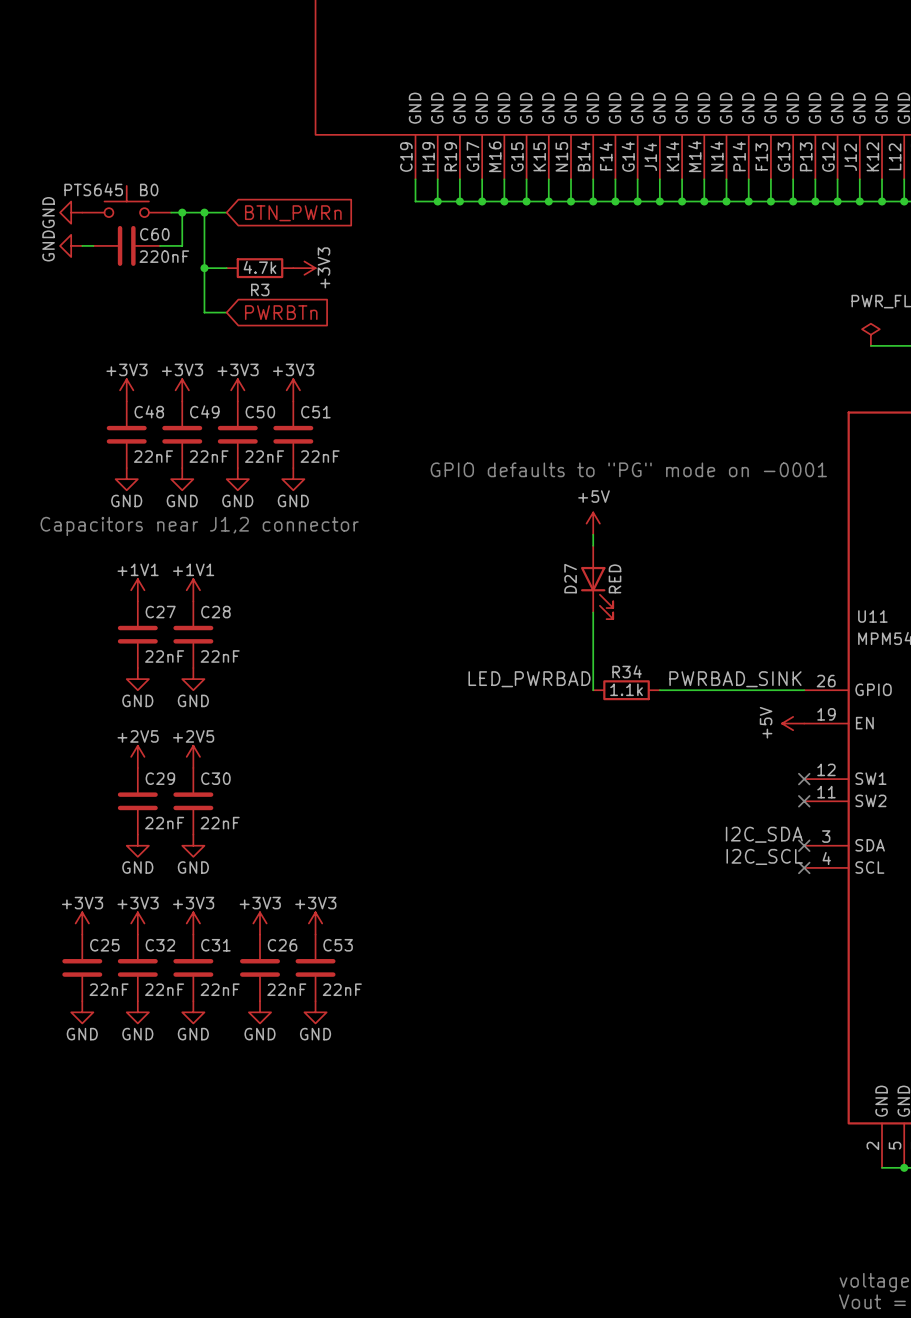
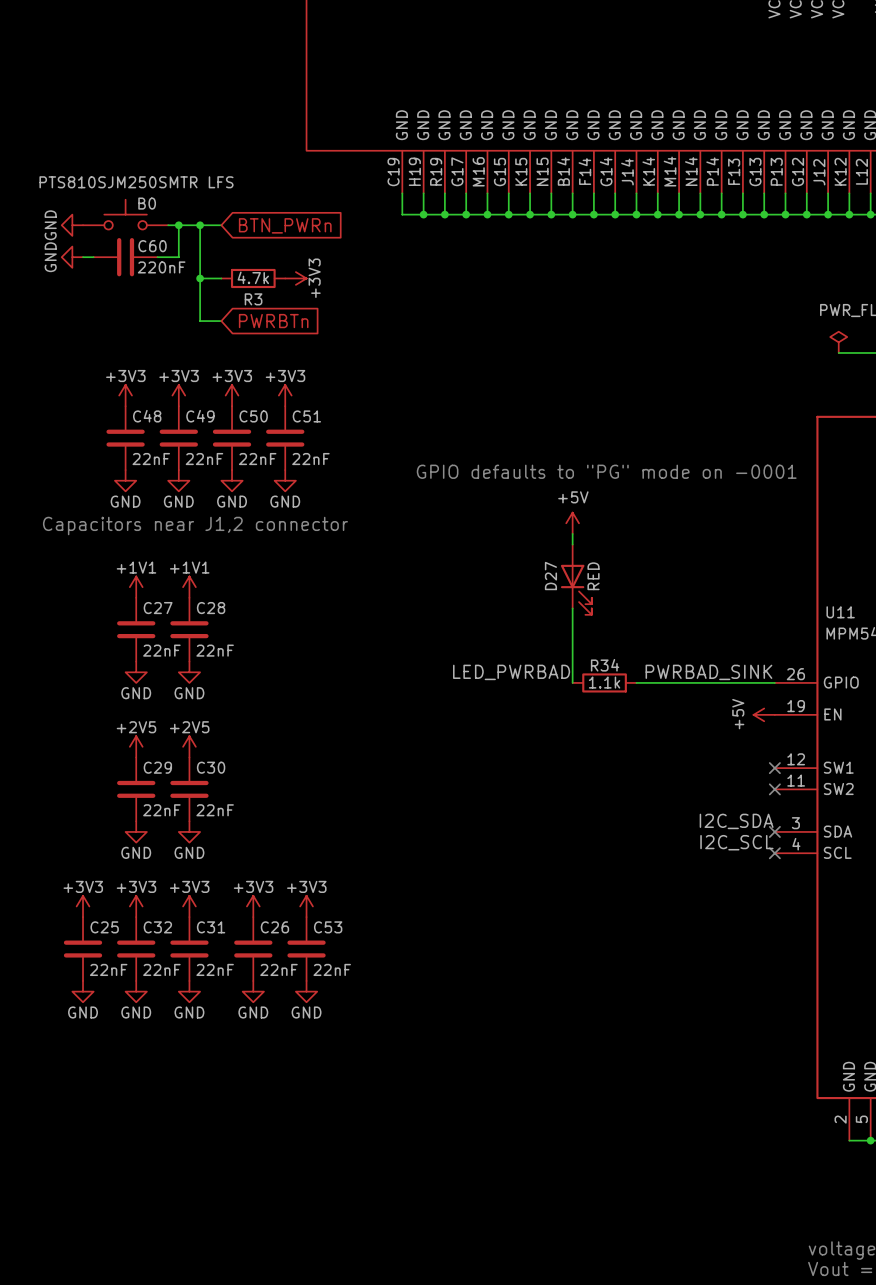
B0 value: PTS645 (93, 189) -> PTS810SJM250SMTR LFS (136, 182)

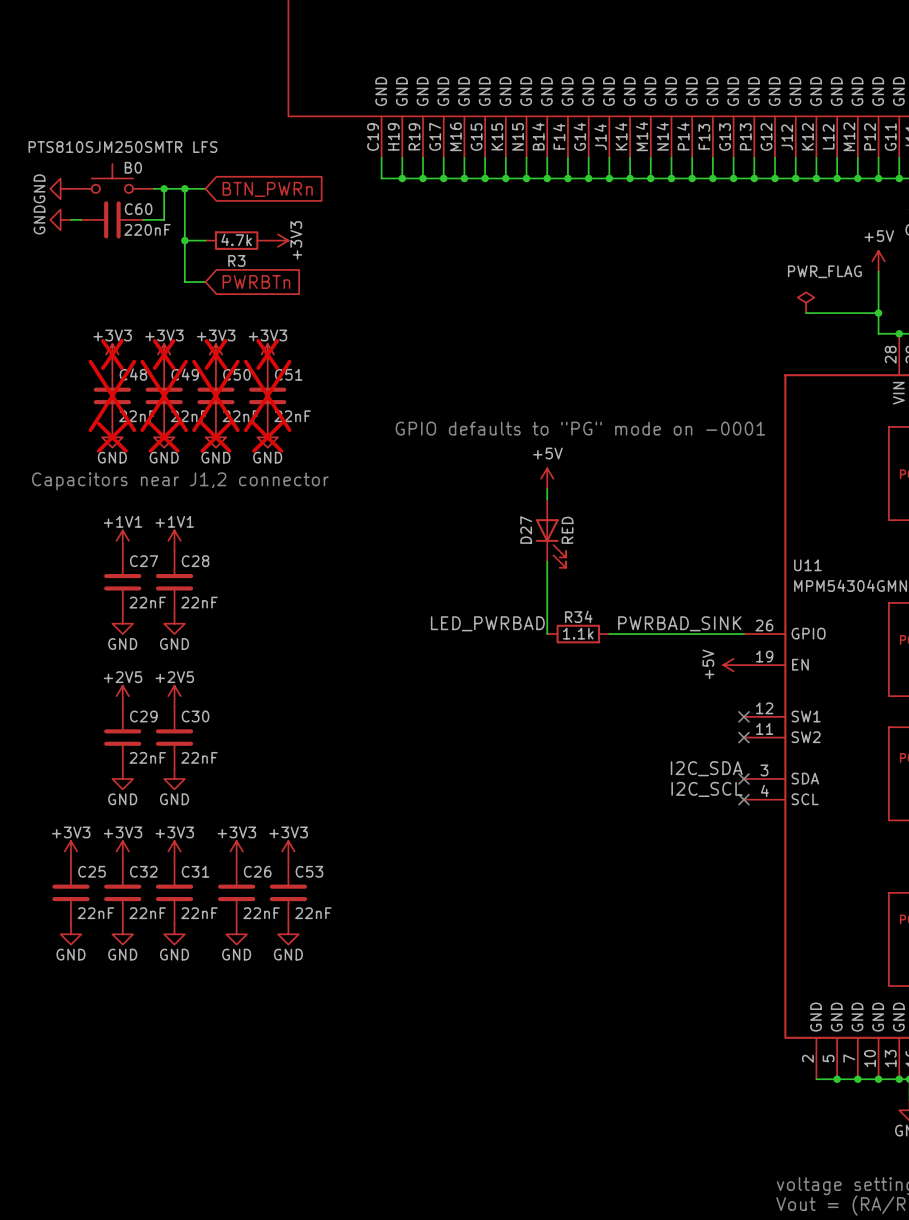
power symbol do-not-place cross: none -> (112, 354)
power symbol do-not-place cross: none -> (164, 354)
power symbol do-not-place cross: none -> (215, 354)
power symbol do-not-place cross: none -> (267, 354)
C48 do-not-place cross: none -> (112, 395)
C49 do-not-place cross: none -> (164, 395)
C50 do-not-place cross: none -> (215, 395)
C51 do-not-place cross: none -> (267, 395)
power symbol do-not-place cross: none -> (112, 437)
power symbol do-not-place cross: none -> (164, 437)
power symbol do-not-place cross: none -> (215, 437)
power symbol do-not-place cross: none -> (267, 437)

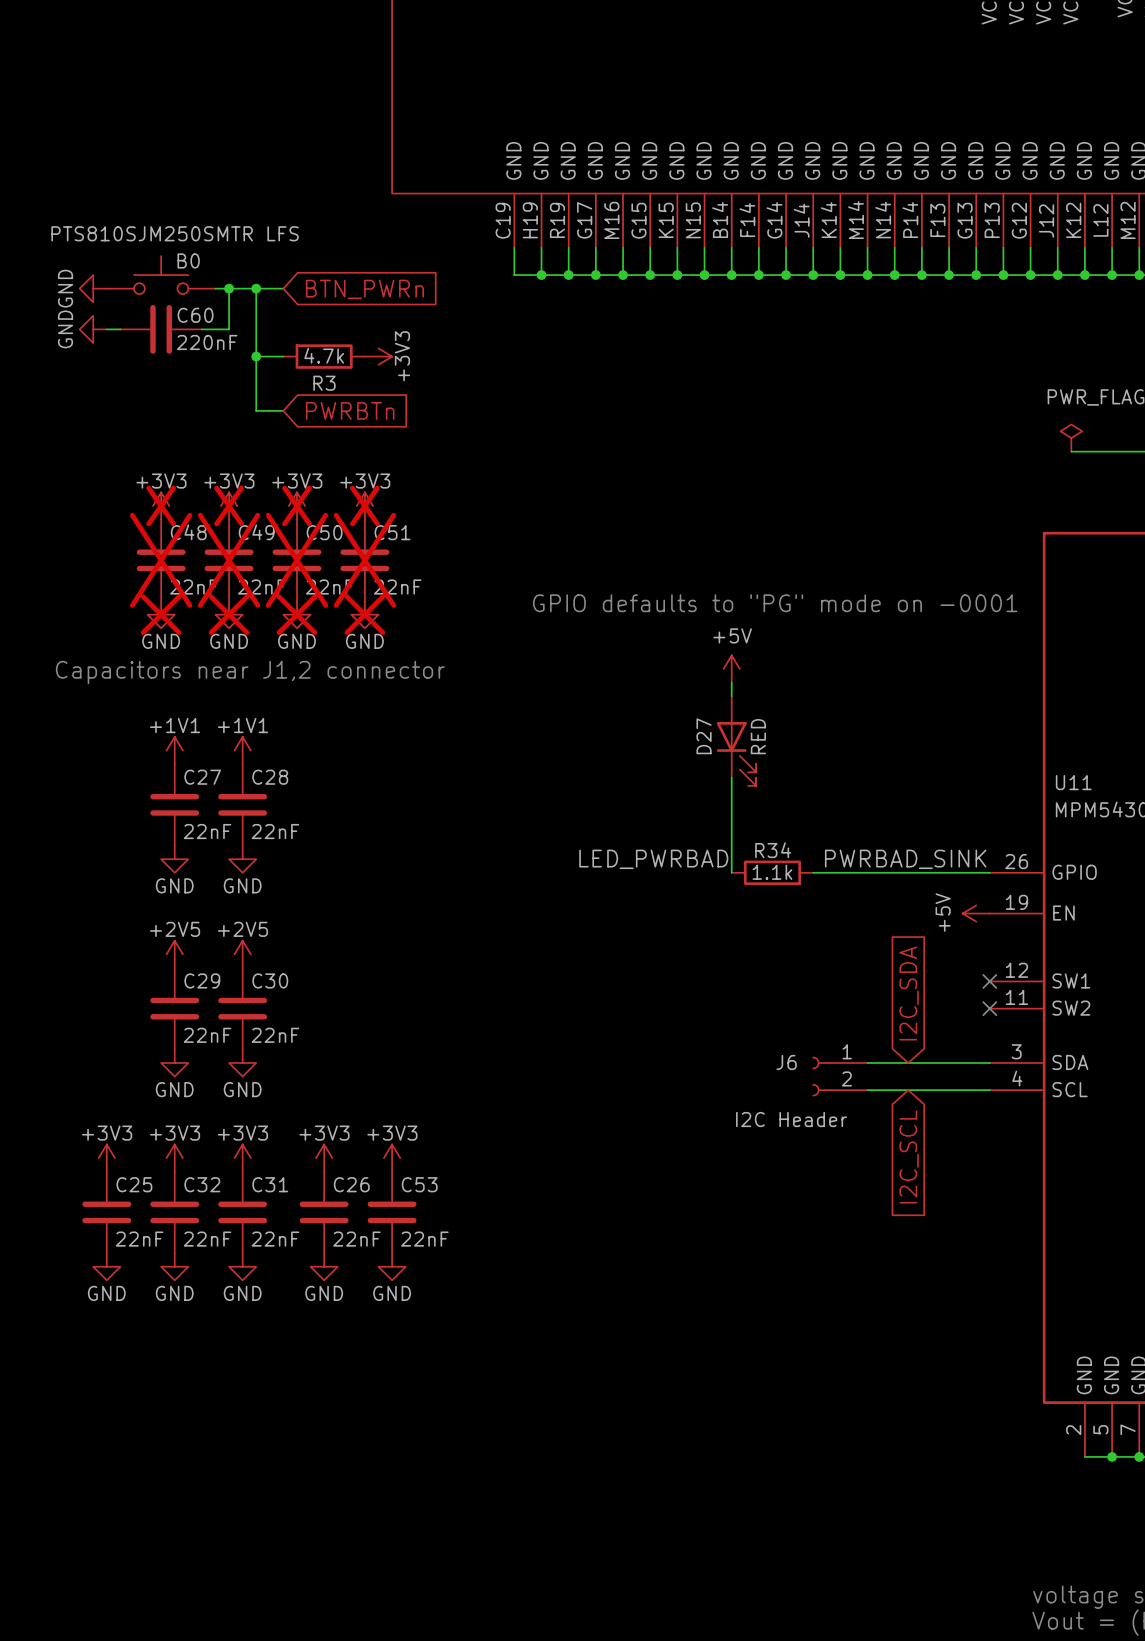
global label: none -> I2C_SDA (909, 993)
label: I2C_SDA (706, 768) -> none
wire: none -> (867, 1062) (989, 1062)
no-connect mark: (743, 778) -> none
J6: none -> I2C Header (839, 1076)
label: I2C_SCL (707, 789) -> none
wire: none -> (867, 1090) (989, 1090)
no-connect mark: (743, 799) -> none
global label: none -> I2C_SCL (909, 1156)

